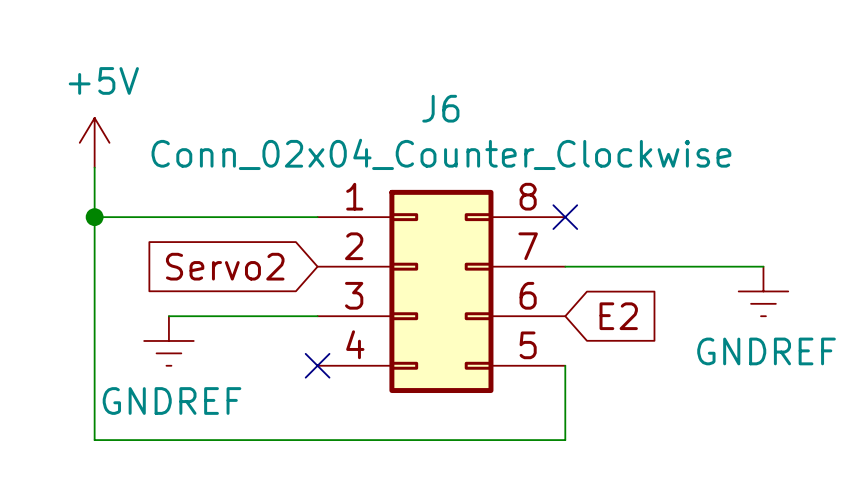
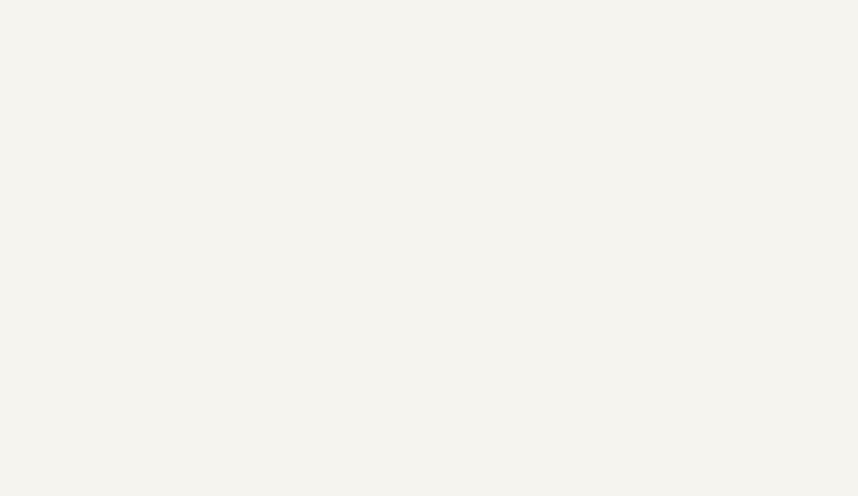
power symbol: +5V (94, 142) -> none
wire: (94, 167) (94, 440) (565, 440) (565, 365) -> none
wire: (94, 217) (317, 217) -> none
junction: (94, 217) -> none
no-connect mark: (565, 217) -> none
global label: Servo2 (225, 266) -> none
wire: (565, 266) (763, 266) -> none
J6: Conn_02x04_Counter_Clockwise (441, 291) -> none
power symbol: GNDREF (763, 291) -> none
wire: (168, 316) (317, 316) -> none
global label: E2 (618, 316) -> none
power symbol: GNDREF (168, 340) -> none
no-connect mark: (317, 365) -> none

